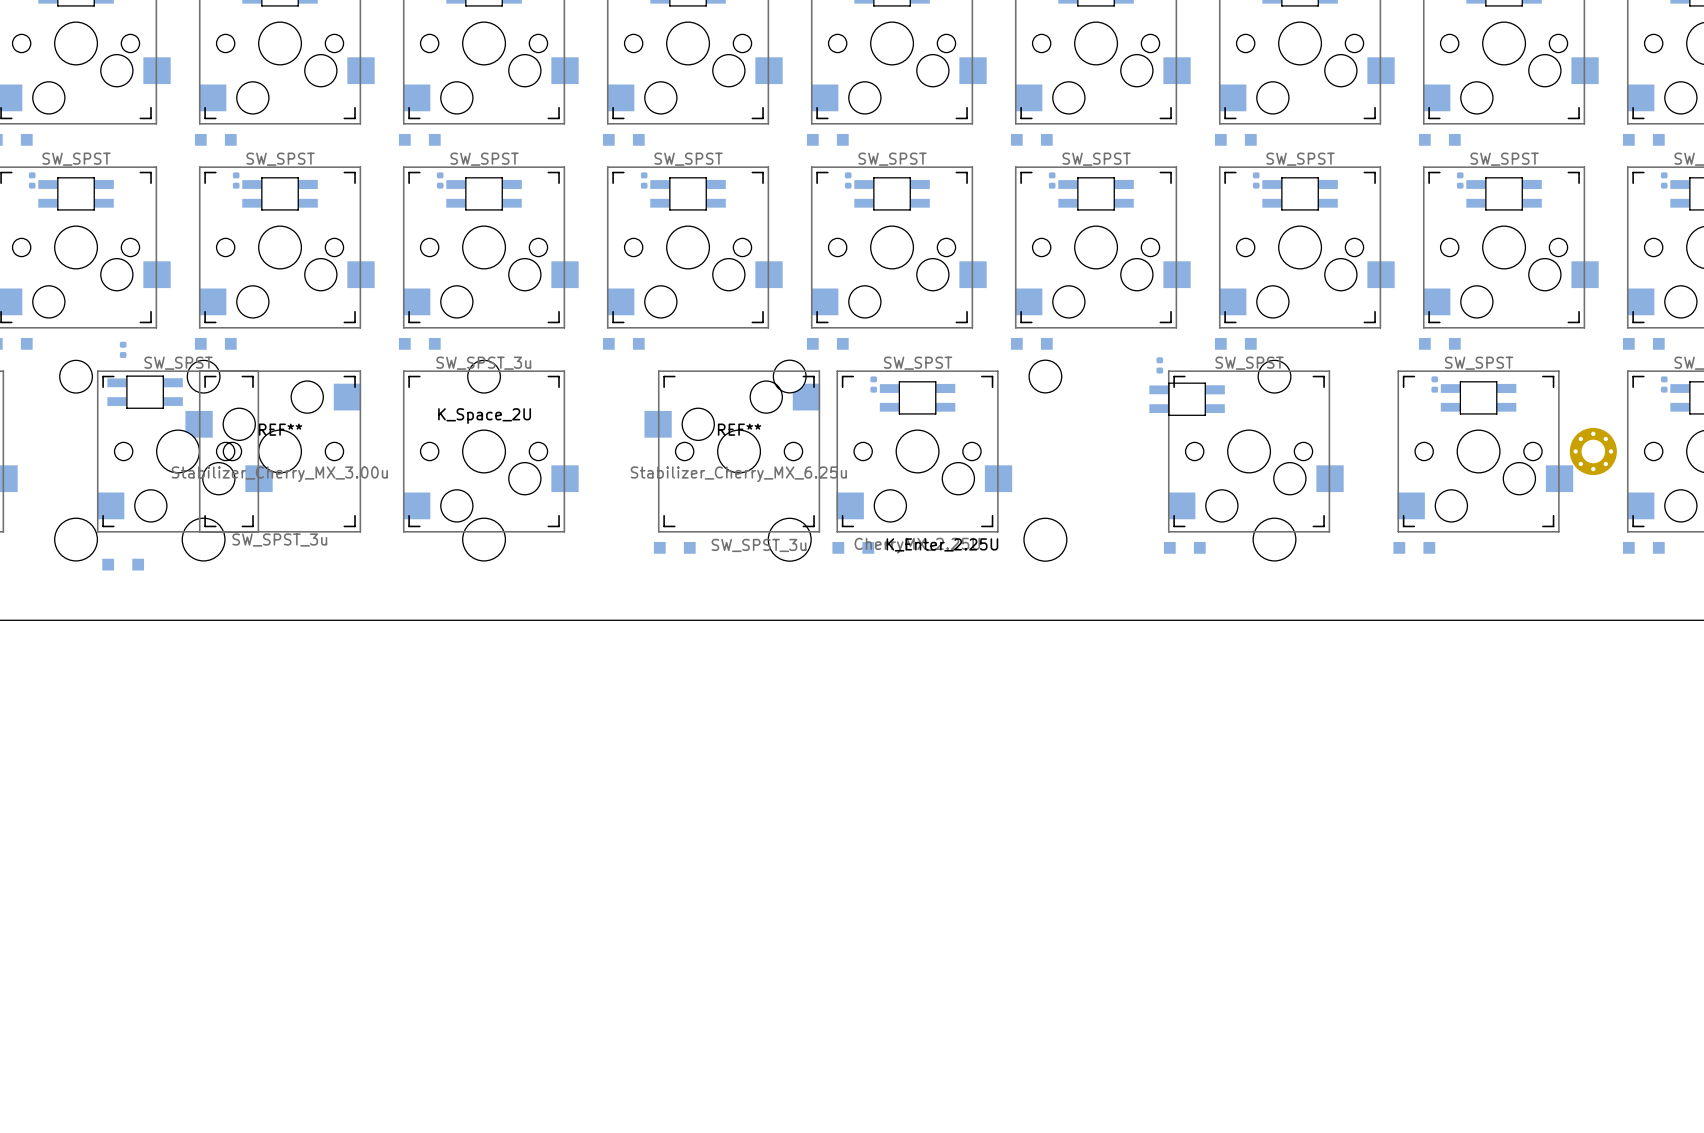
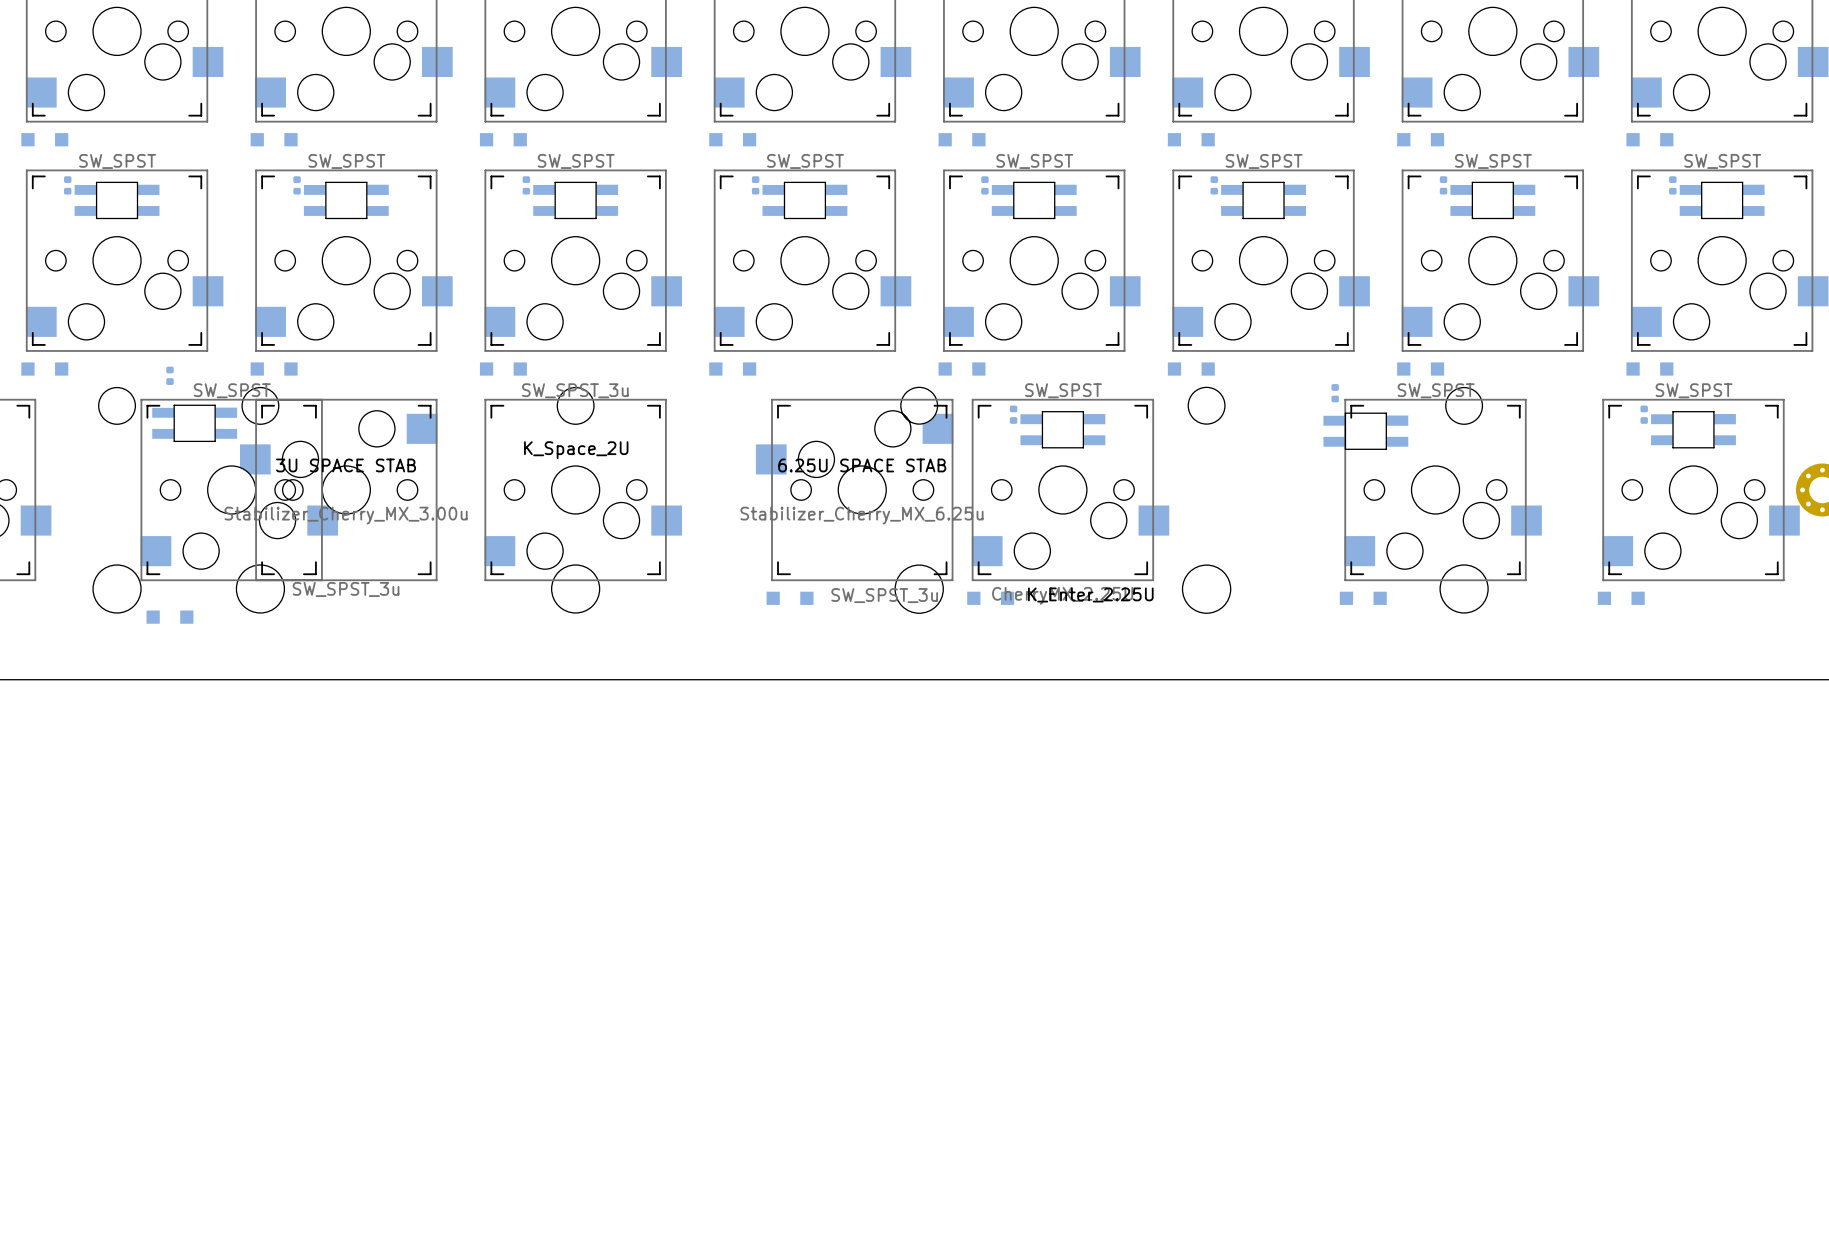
REF** name: REF** (280, 429) -> 3U SPACE STAB (346, 465)
REF** name: REF** (739, 429) -> 6.25U SPACE STAB (862, 465)

